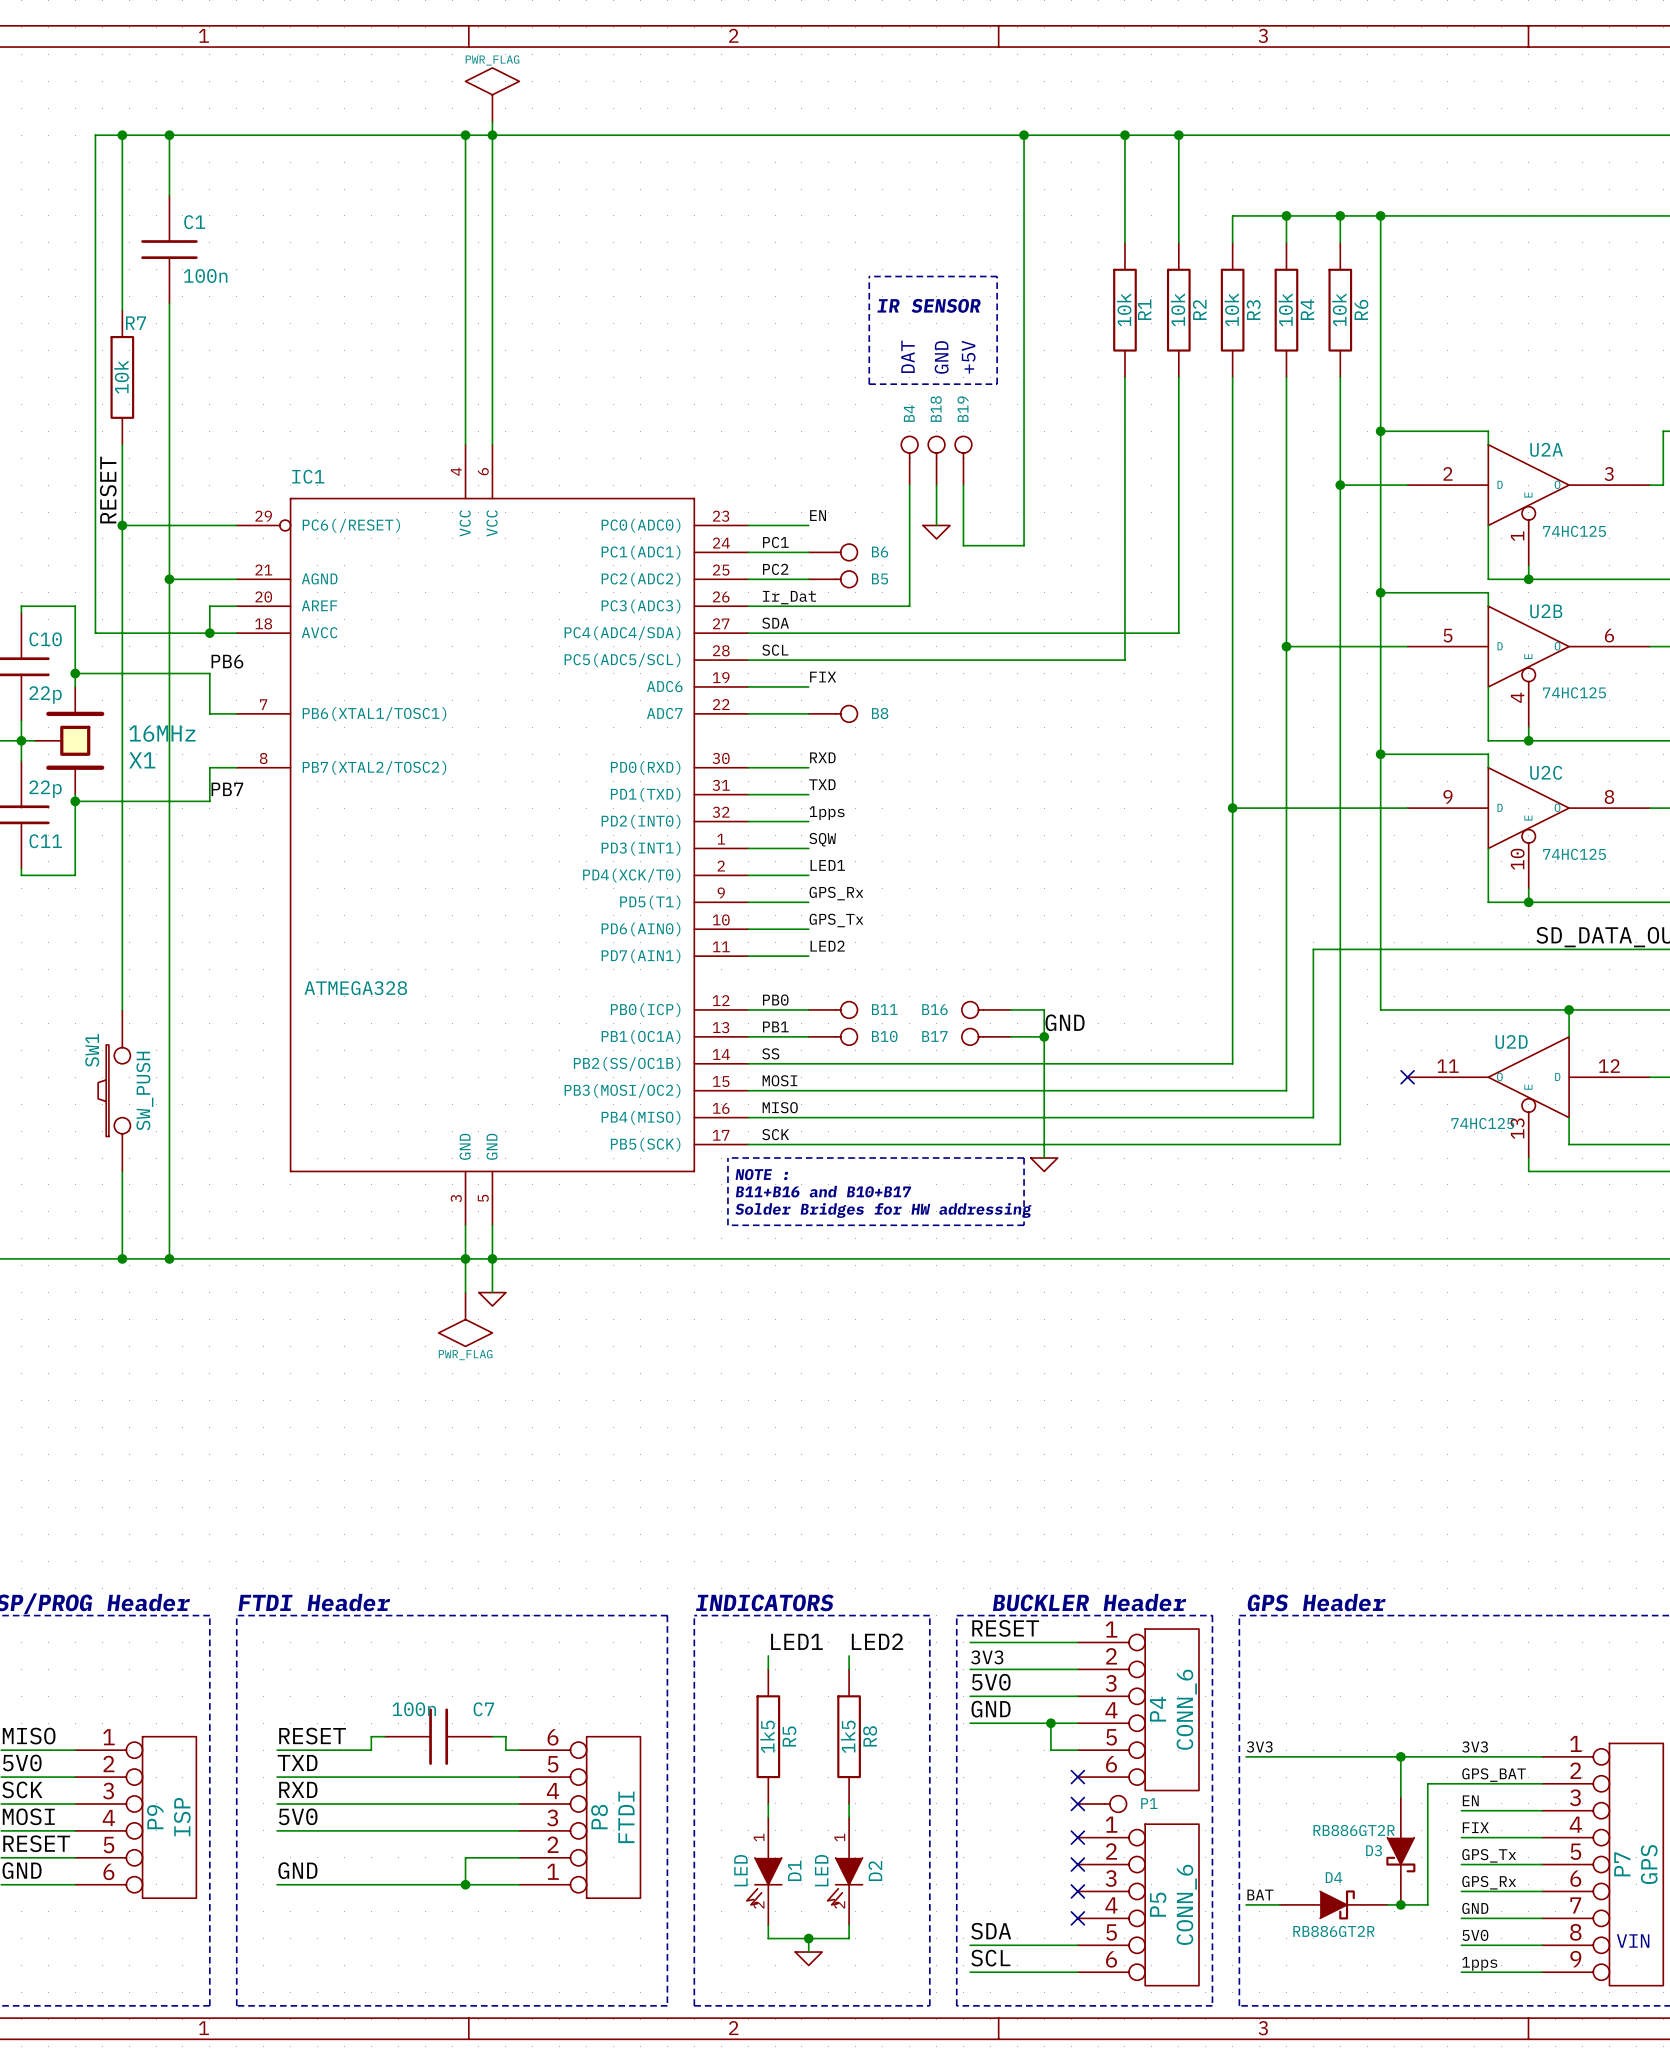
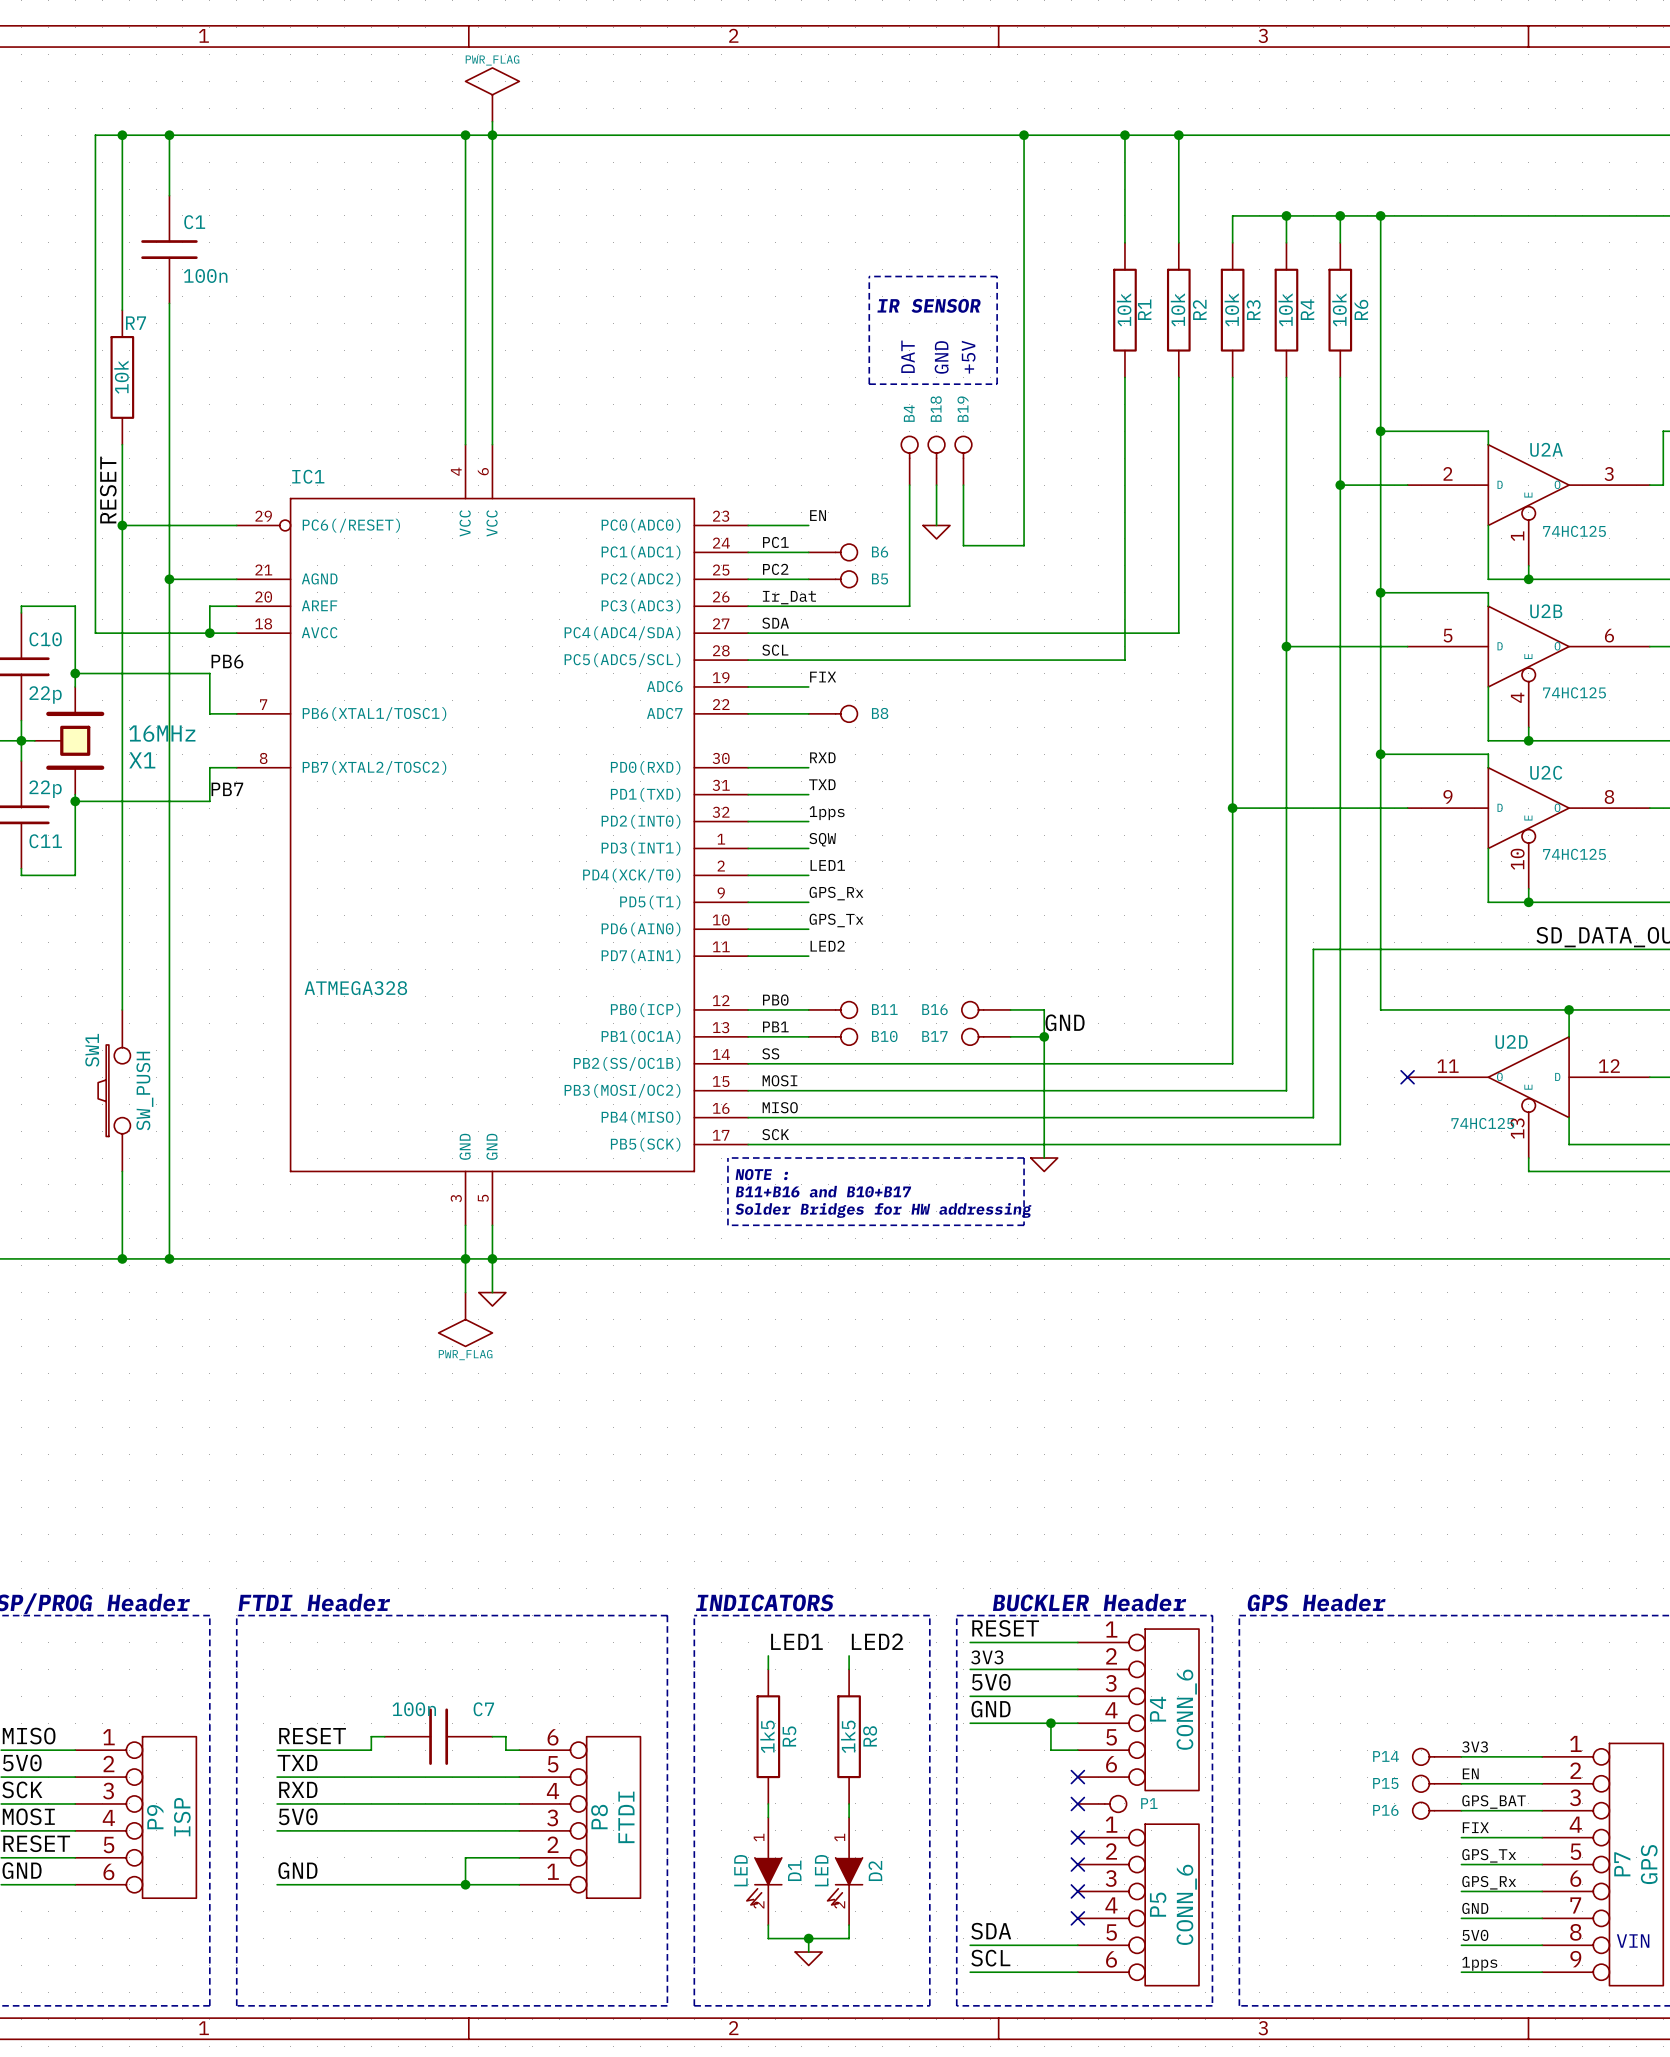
label: 3V3 (1259, 1746) -> none
wire: (1246, 1756) (1461, 1756) -> none
wire: (1400, 1756) (1400, 1797) -> none
junction: (1400, 1756) -> none
P14: none -> (1437, 1756)
label: GPS_BAT (1494, 1775) -> EN (1470, 1773)
P15: none -> (1437, 1783)
wire: (1461, 1783) (1427, 1783) (1427, 1904) (1387, 1904) -> none
label: EN (1470, 1800) -> GPS_BAT (1494, 1801)
P16: none -> (1437, 1810)
D3: RB886GT2R (1400, 1851) -> none
label: BAT (1260, 1894) -> none
wire: (1246, 1904) (1279, 1904) -> none
D4: RB886GT2R (1333, 1904) -> none
junction: (1400, 1904) -> none

